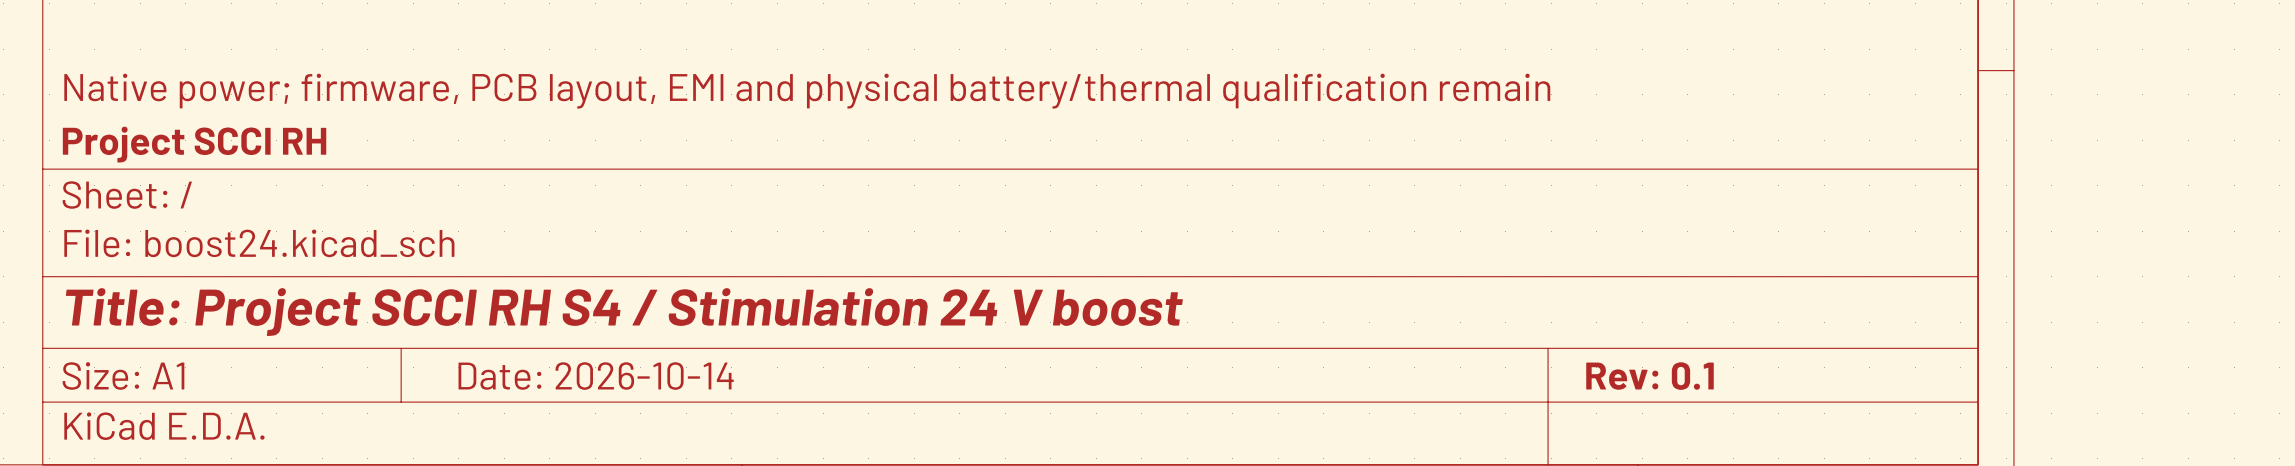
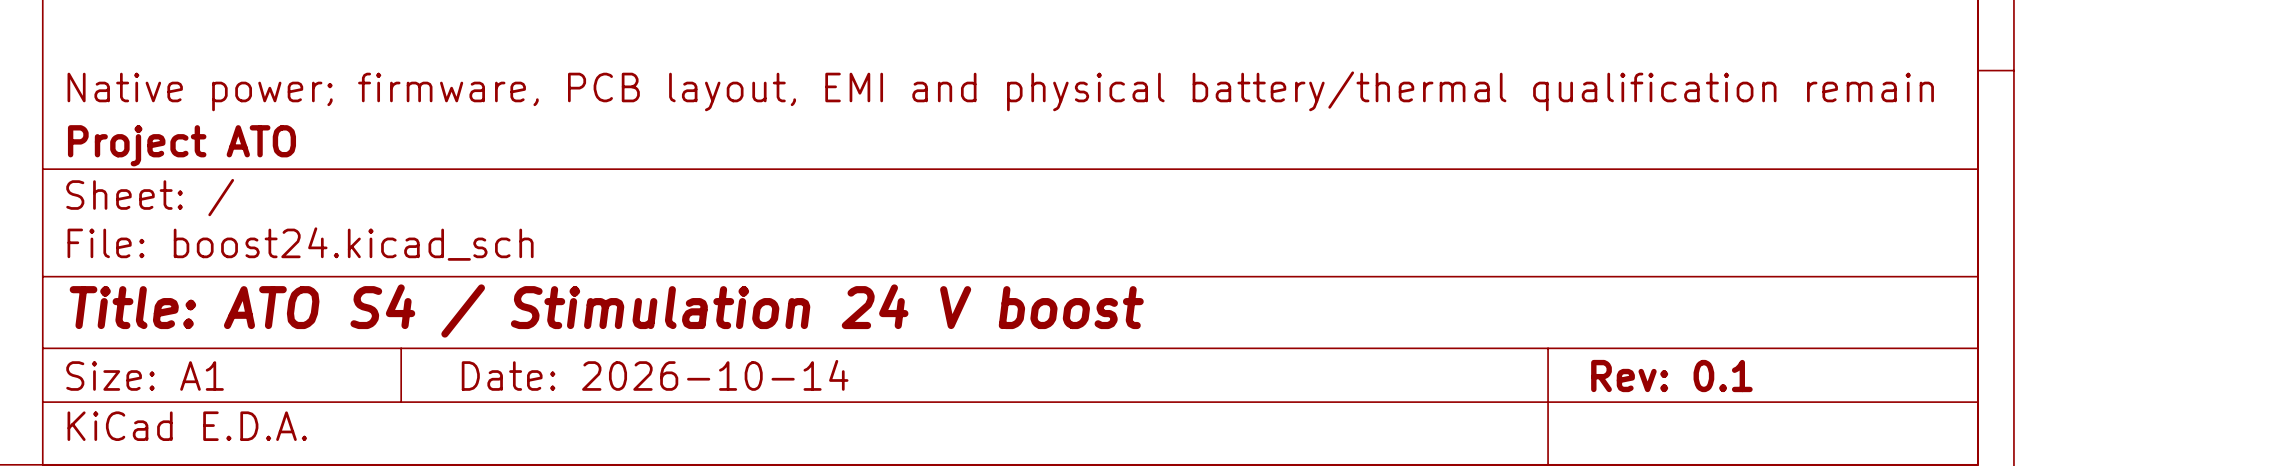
title block: Project SCCI RH (194, 144) -> Project ATO (181, 145)
title block: Title: Project SCCI RH S4 / Stimulation 24 V boost (624, 312) -> Title: ATO S4 / Stimulation 24 V boost (606, 310)

